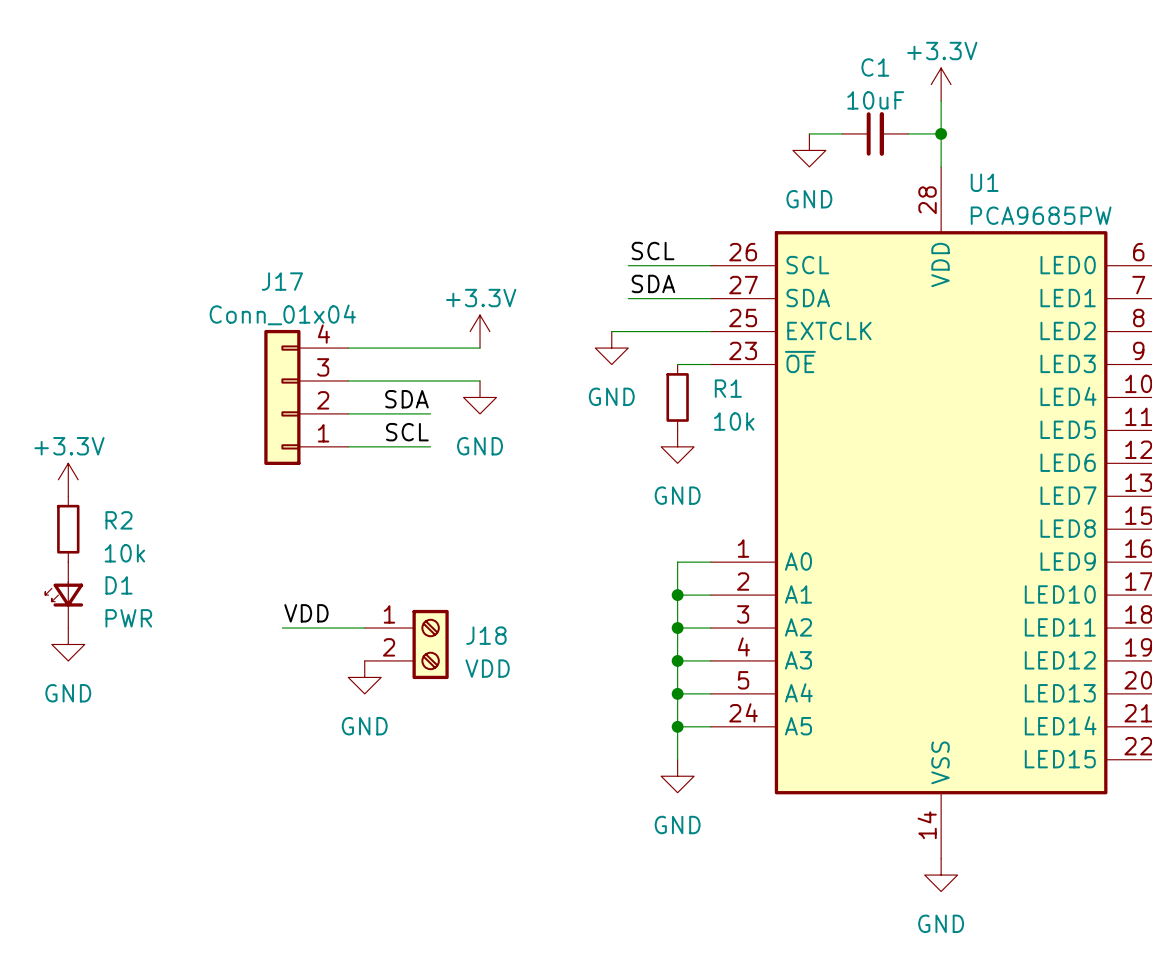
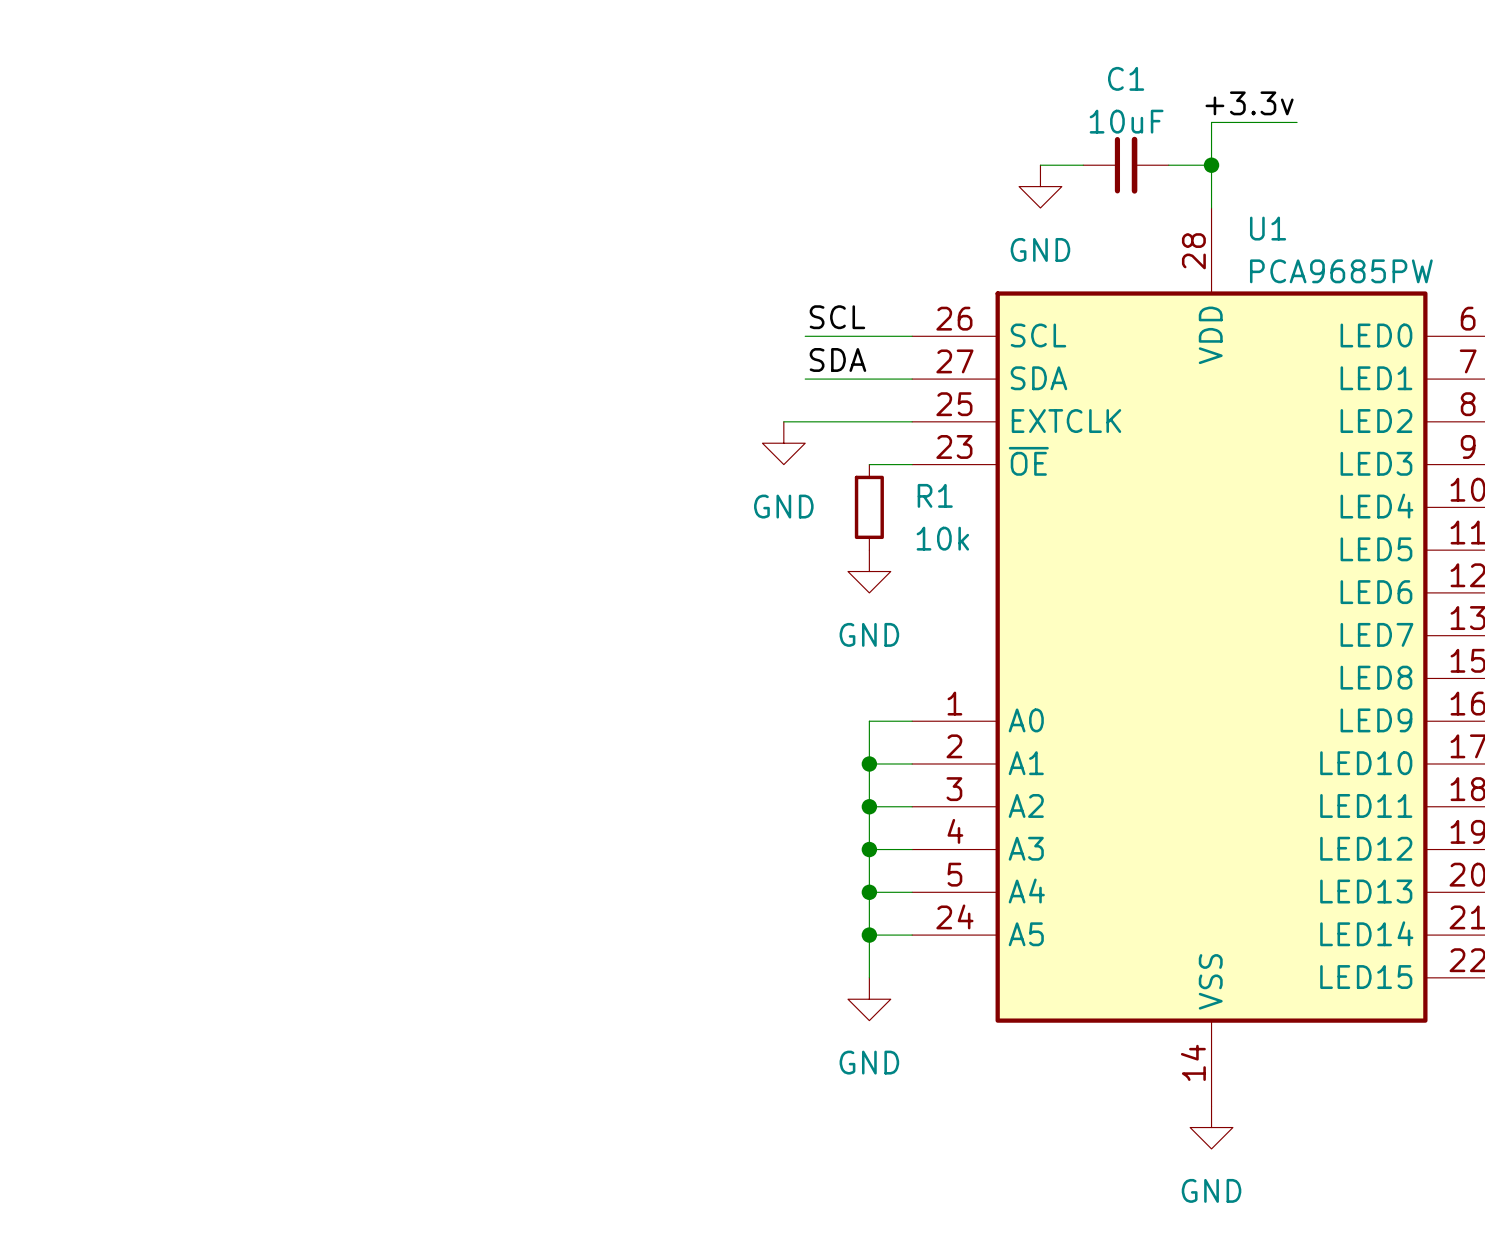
power symbol: +3.3V (941, 84) -> none
label: none -> +3.3v (1249, 103)
wire: none -> (1211, 122) (1297, 122)
power symbol: +3.3V (480, 331) -> none
wire: (348, 348) (480, 348) -> none
wire: (348, 380) (480, 380) -> none
J17: Conn_01x04 (306, 397) -> none
power symbol: GND (480, 397) -> none
label: SDA (406, 399) -> none
wire: (348, 413) (430, 413) -> none
label: SCL (407, 432) -> none
wire: (348, 446) (430, 446) -> none
power symbol: +3.3V (68, 479) -> none
R2: 10k (68, 529) -> none
D1: PWR (64, 595) -> none
label: VDD (306, 613) -> none
wire: (282, 628) (364, 628) -> none
power symbol: GND (68, 644) -> none
J18: VDD (406, 644) -> none
power symbol: GND (364, 677) -> none

